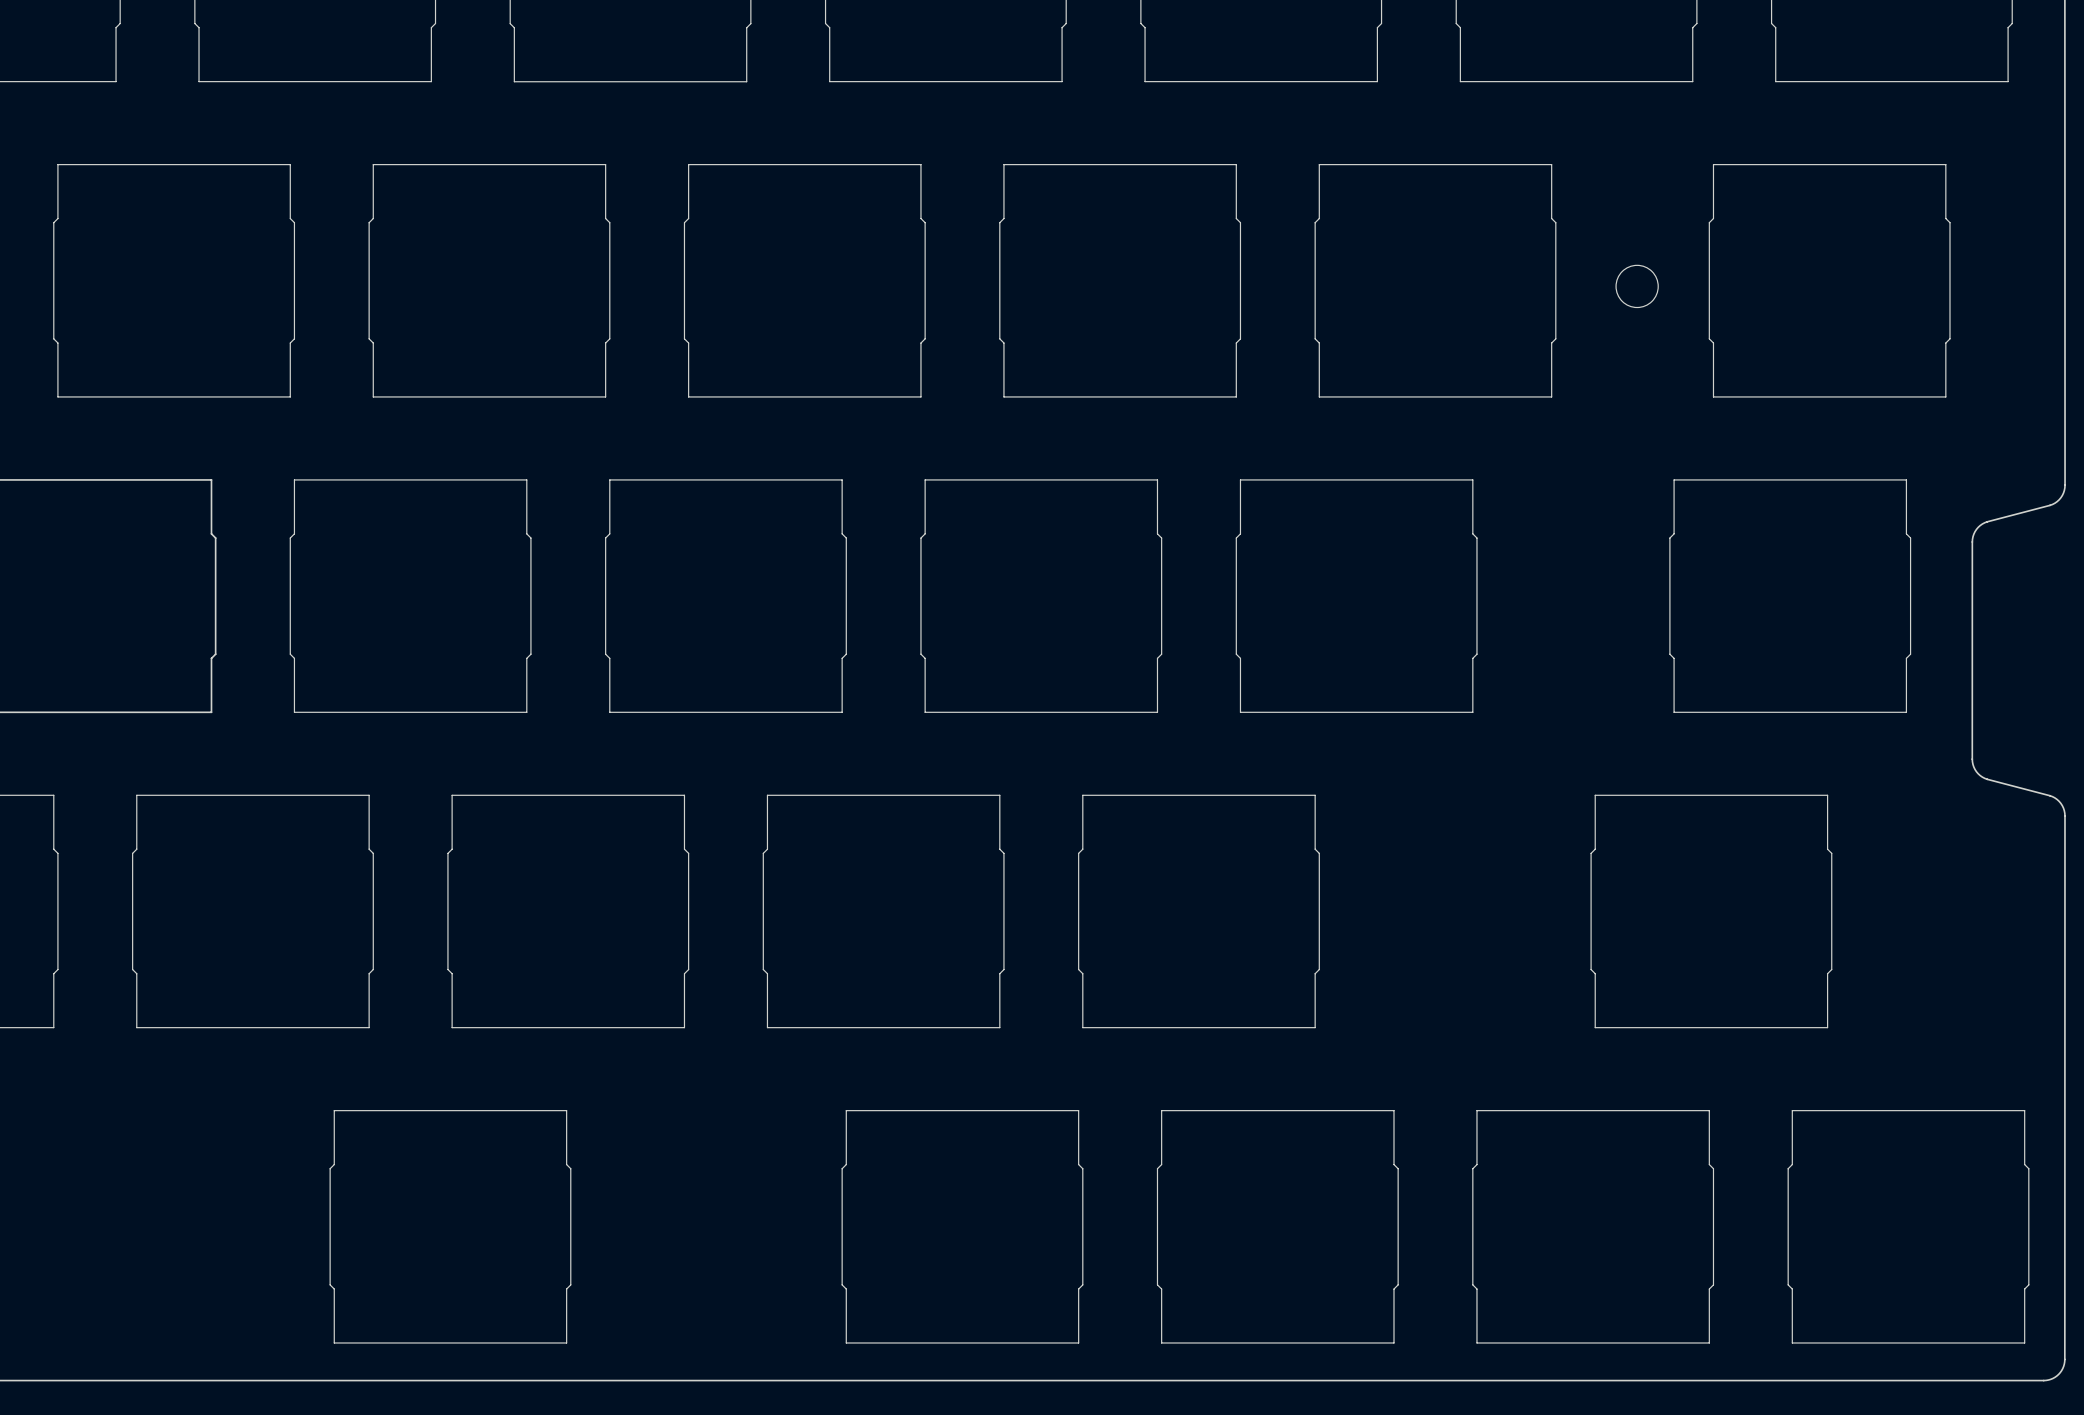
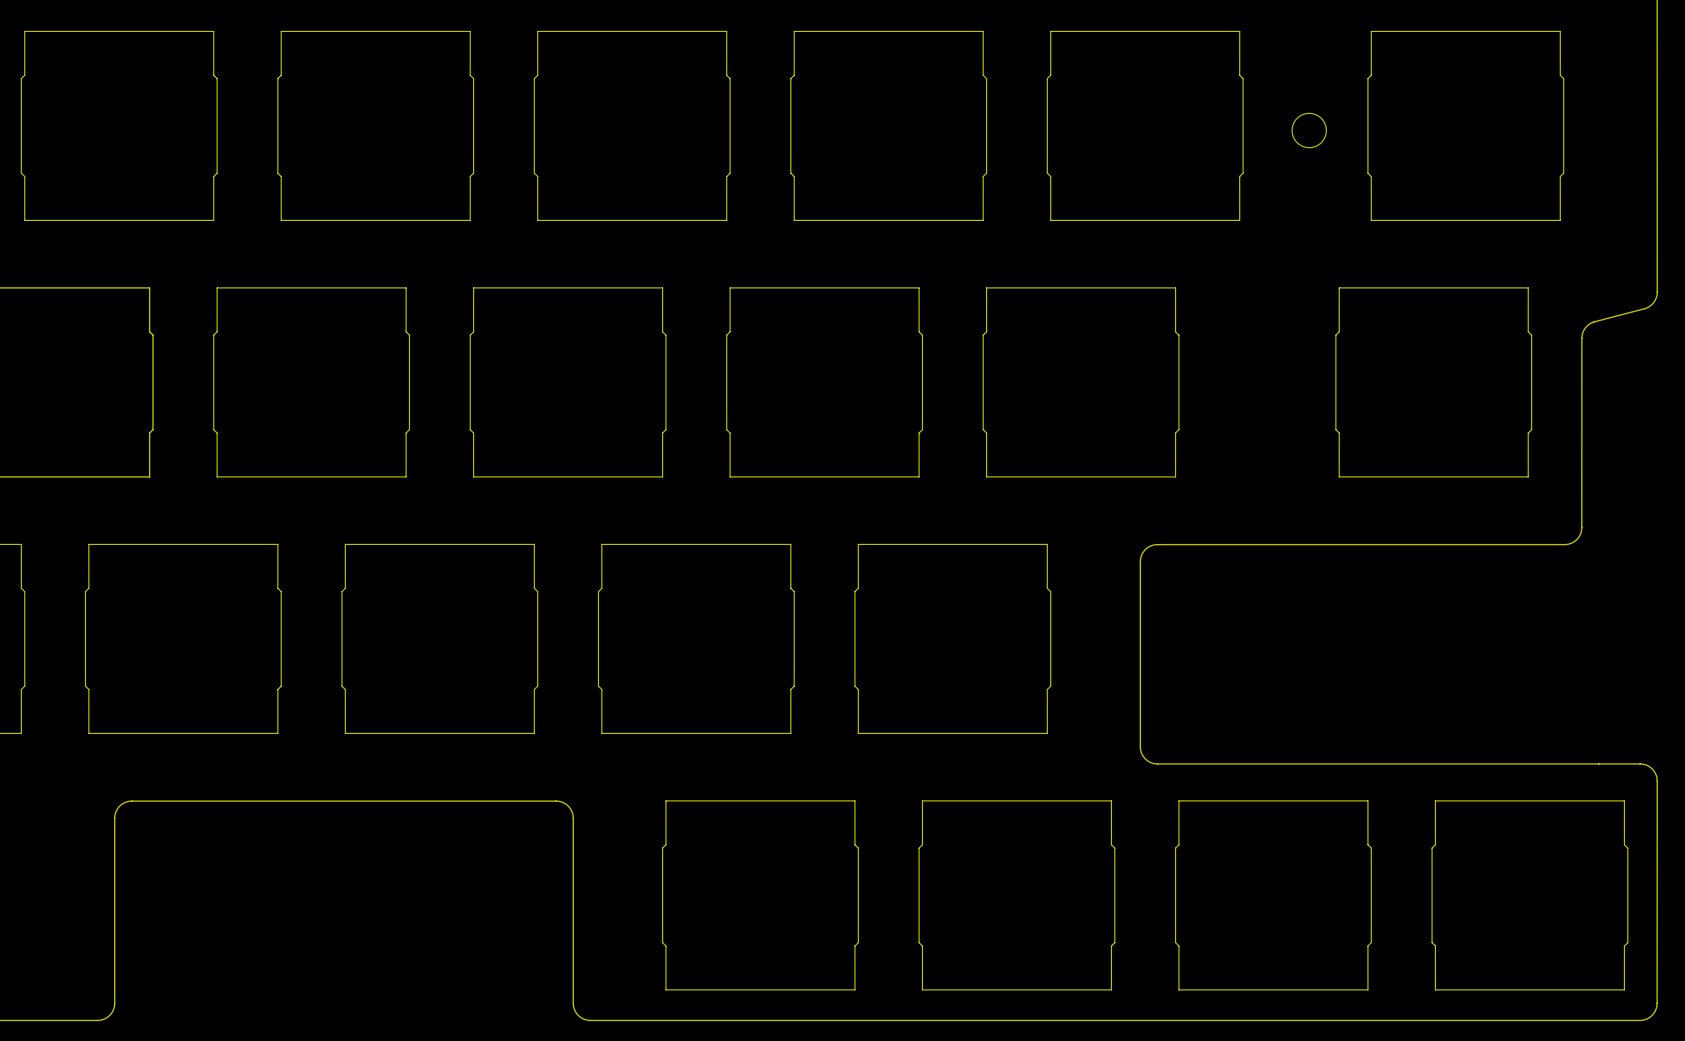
board edge: (1972, 759) (1974, 769) (1982, 777) (2052, 796) (2060, 803) (2064, 813) (2064, 1359) -> (1581, 515) (1580, 534) (1575, 540) (1566, 544) (1157, 544) (1150, 546) (1142, 552) (1140, 561) (1140, 748) (1145, 758) (1157, 763) (1640, 763) (1647, 765) (1654, 771) (1657, 781) (1657, 1003)
drawing: [1590, 794, 1833, 1029] -> none
drawing: [329, 1110, 572, 1344] -> none
board edge: (147, 1380) (753, 1380) -> (97, 1020) (108, 1016) (114, 1005) (114, 816) (121, 804) (131, 801) (556, 801) (563, 802) (570, 809) (573, 818) (573, 1005) (578, 1015) (590, 1020)

